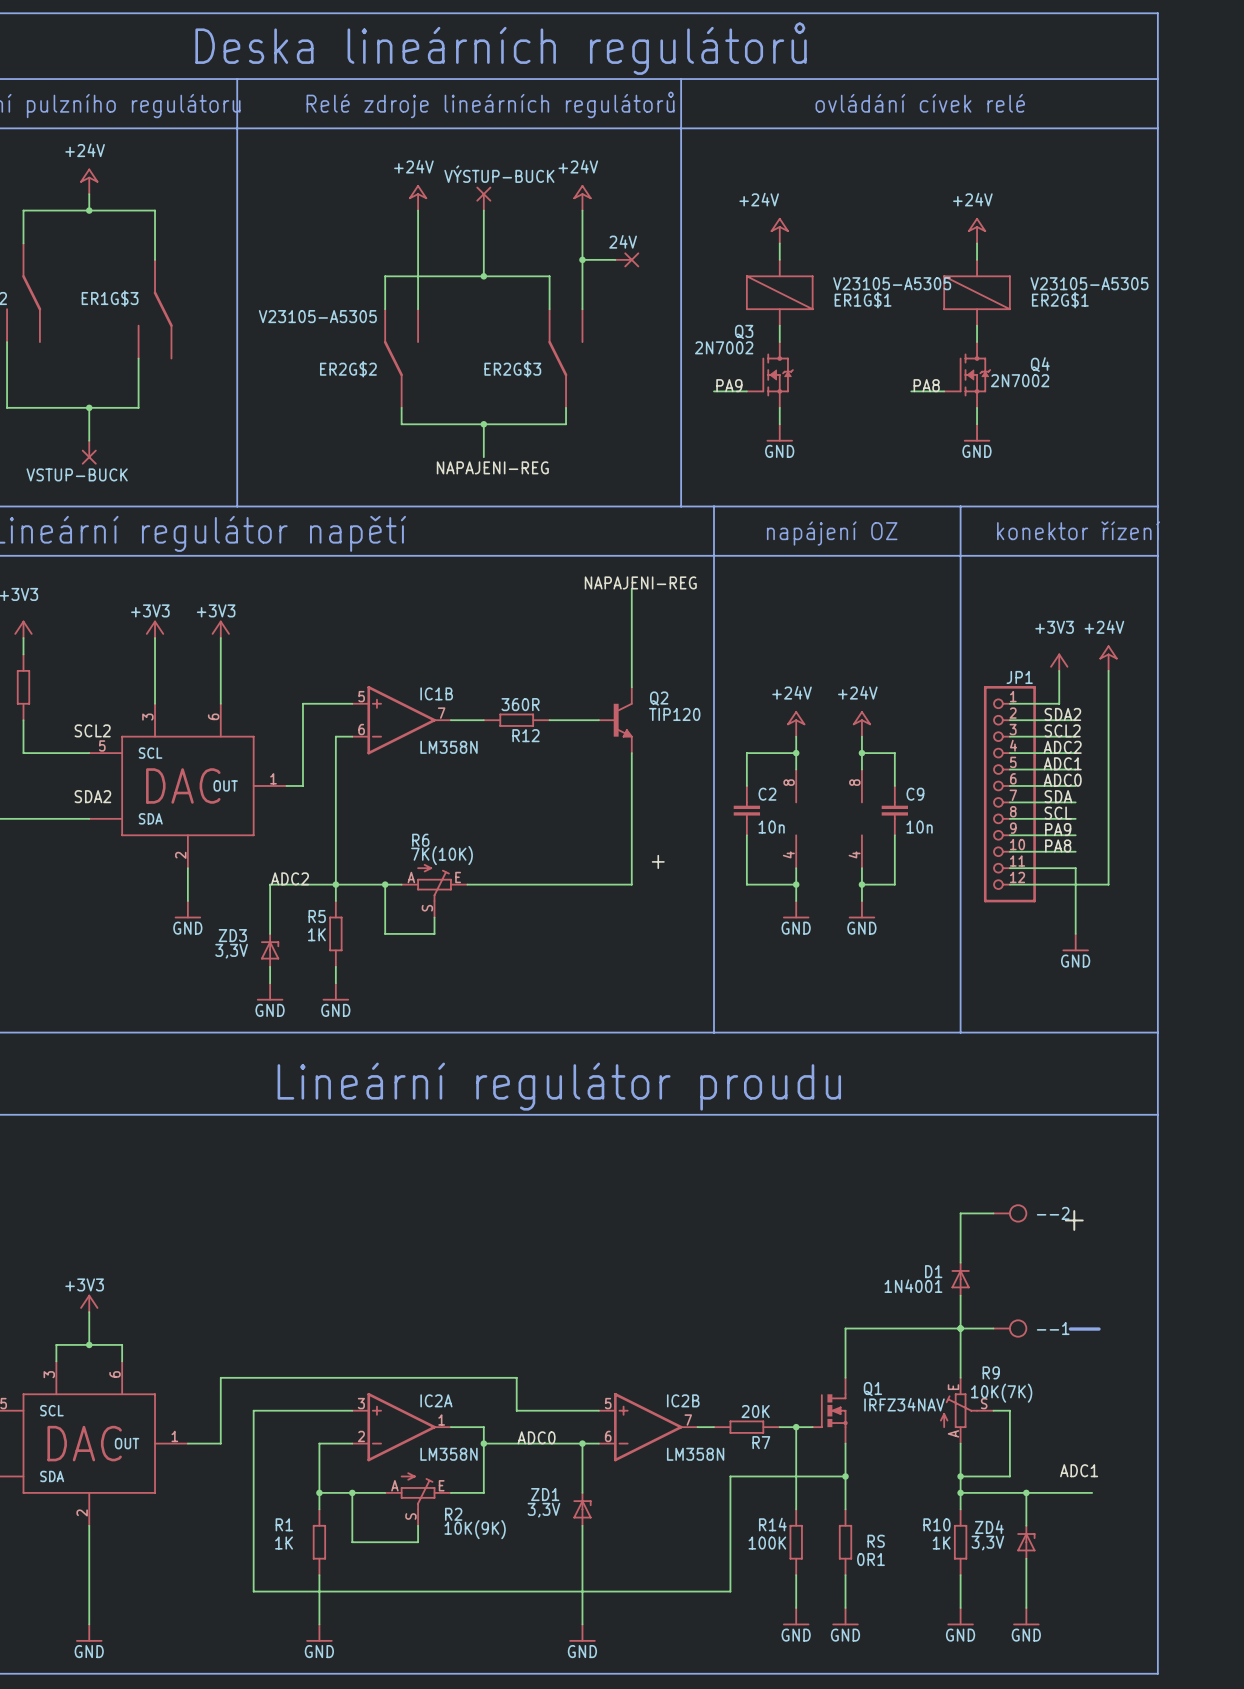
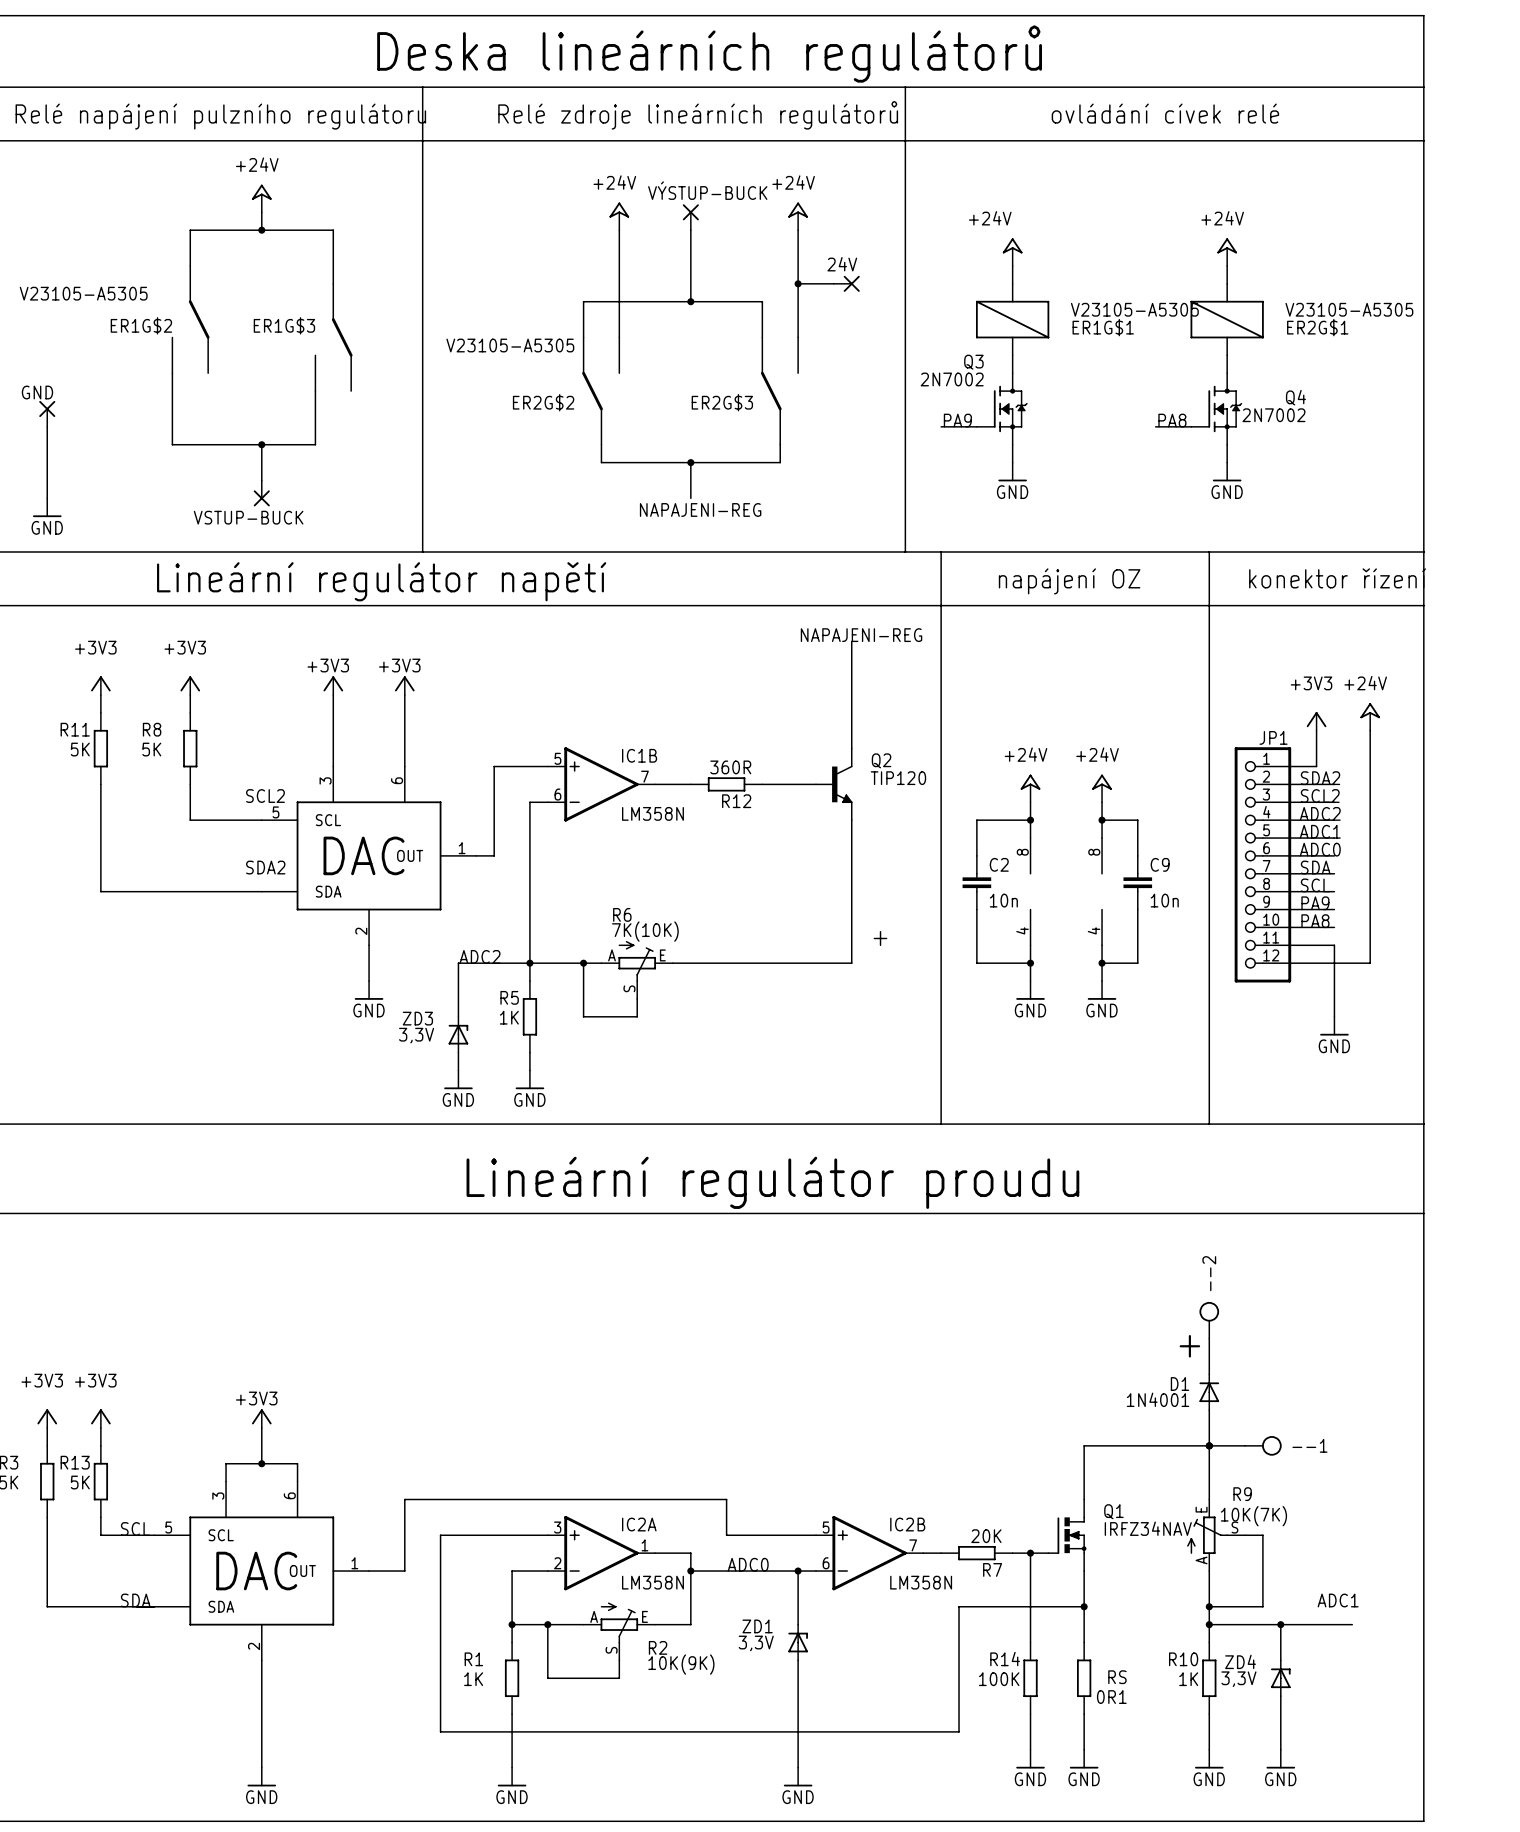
wire: (993, 1213) (960, 1213) (960, 1229) -> none
--2 position: (1010, 1213) -> (1209, 1320)
--2 rotation: 0° (1018, 1213) -> 90° counterclockwise (1209, 1311)
label position: + (1074, 1220) -> + (1189, 1346)
text: - (1084, 1329) -> none

